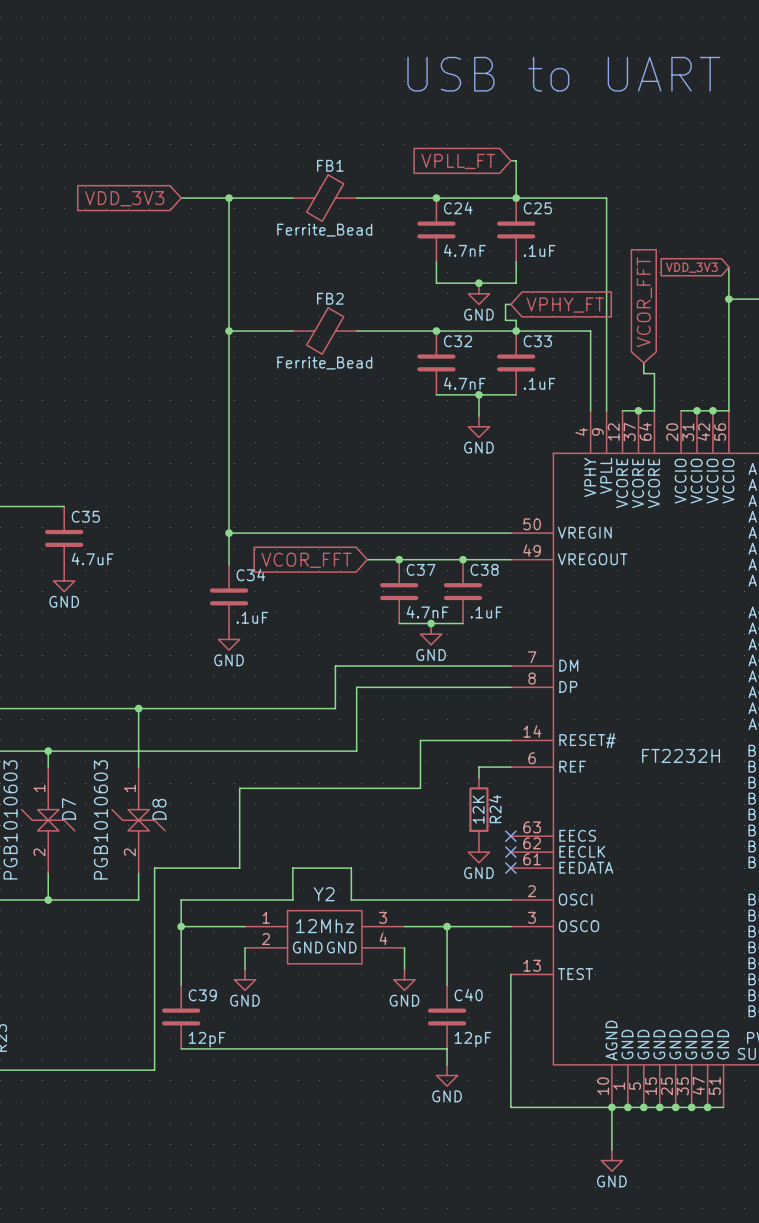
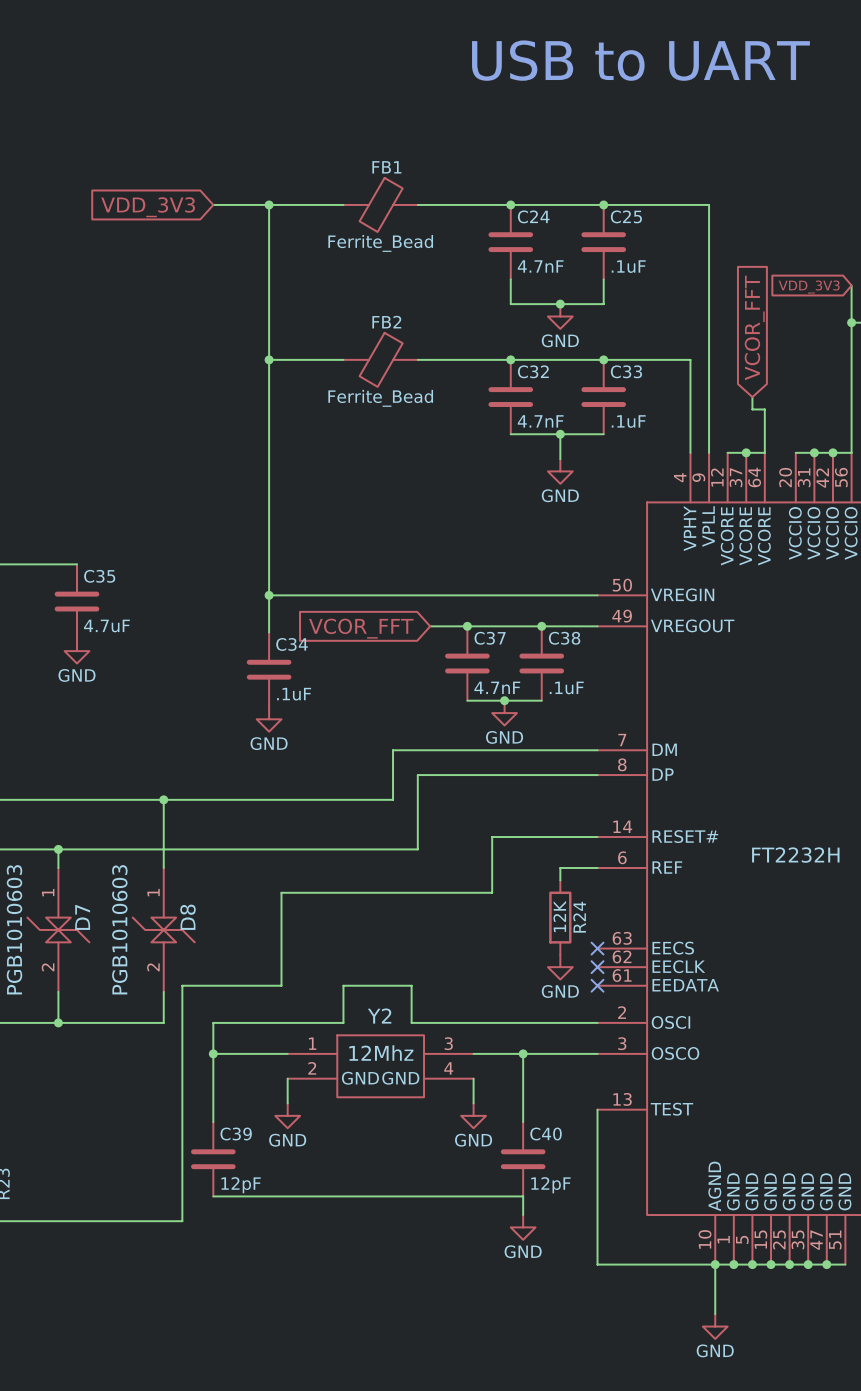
wire: (510, 160) (516, 160) (516, 198) -> none
global label: VPLL_FT (458, 161) -> none
wire: (510, 304) (505, 304) (505, 320) (516, 320) (516, 331) -> none
global label: VPHY_FT (565, 305) -> none

